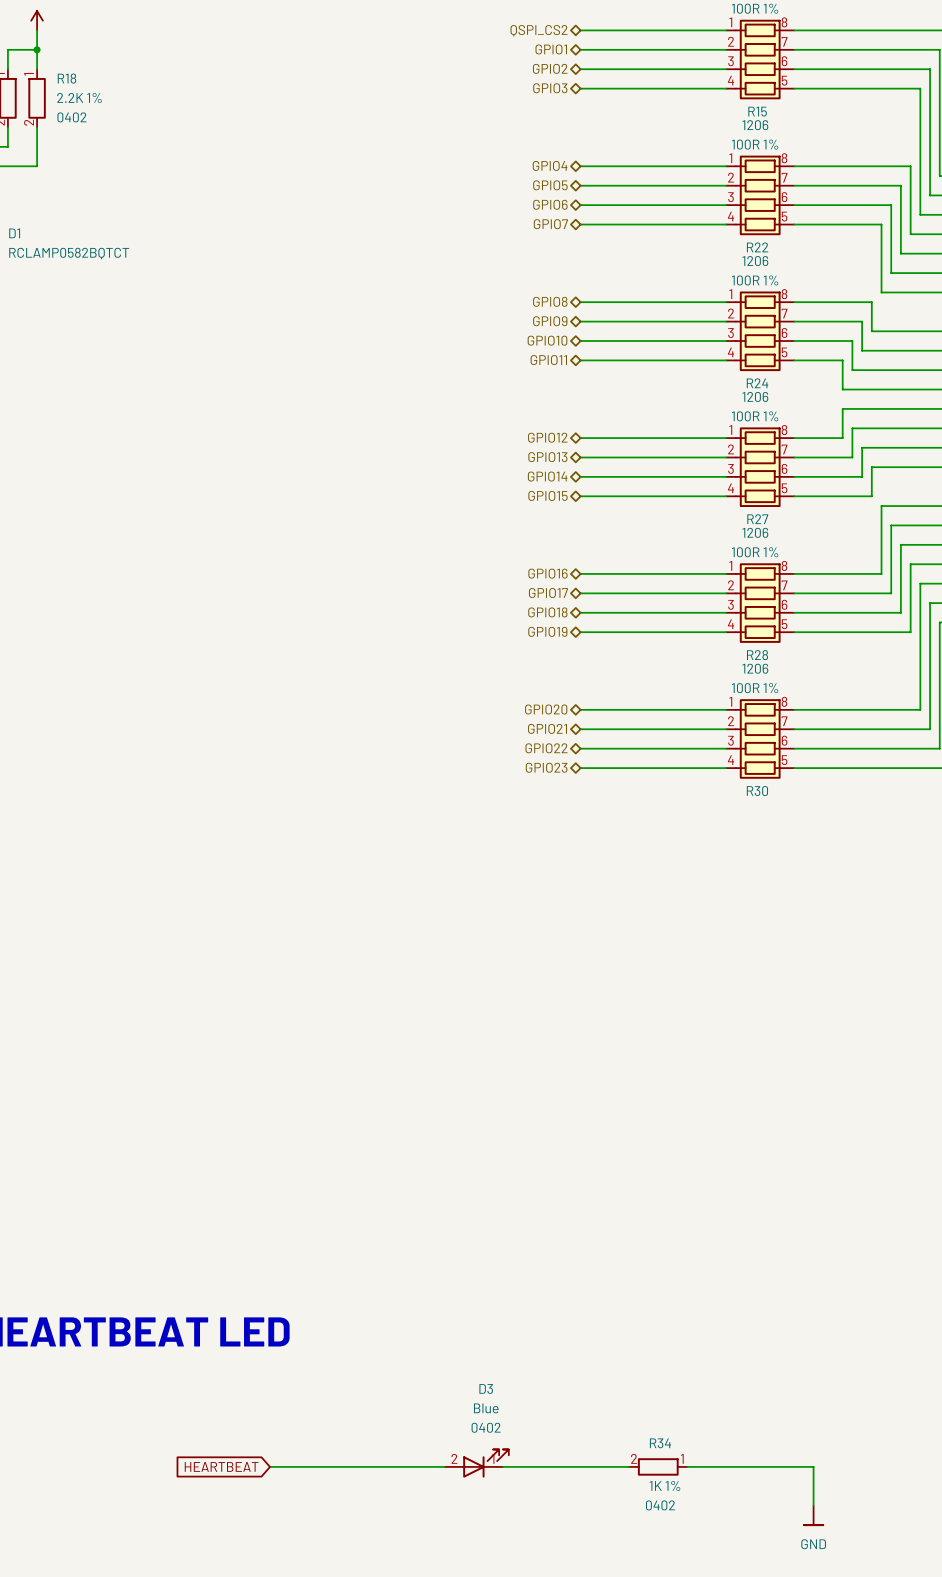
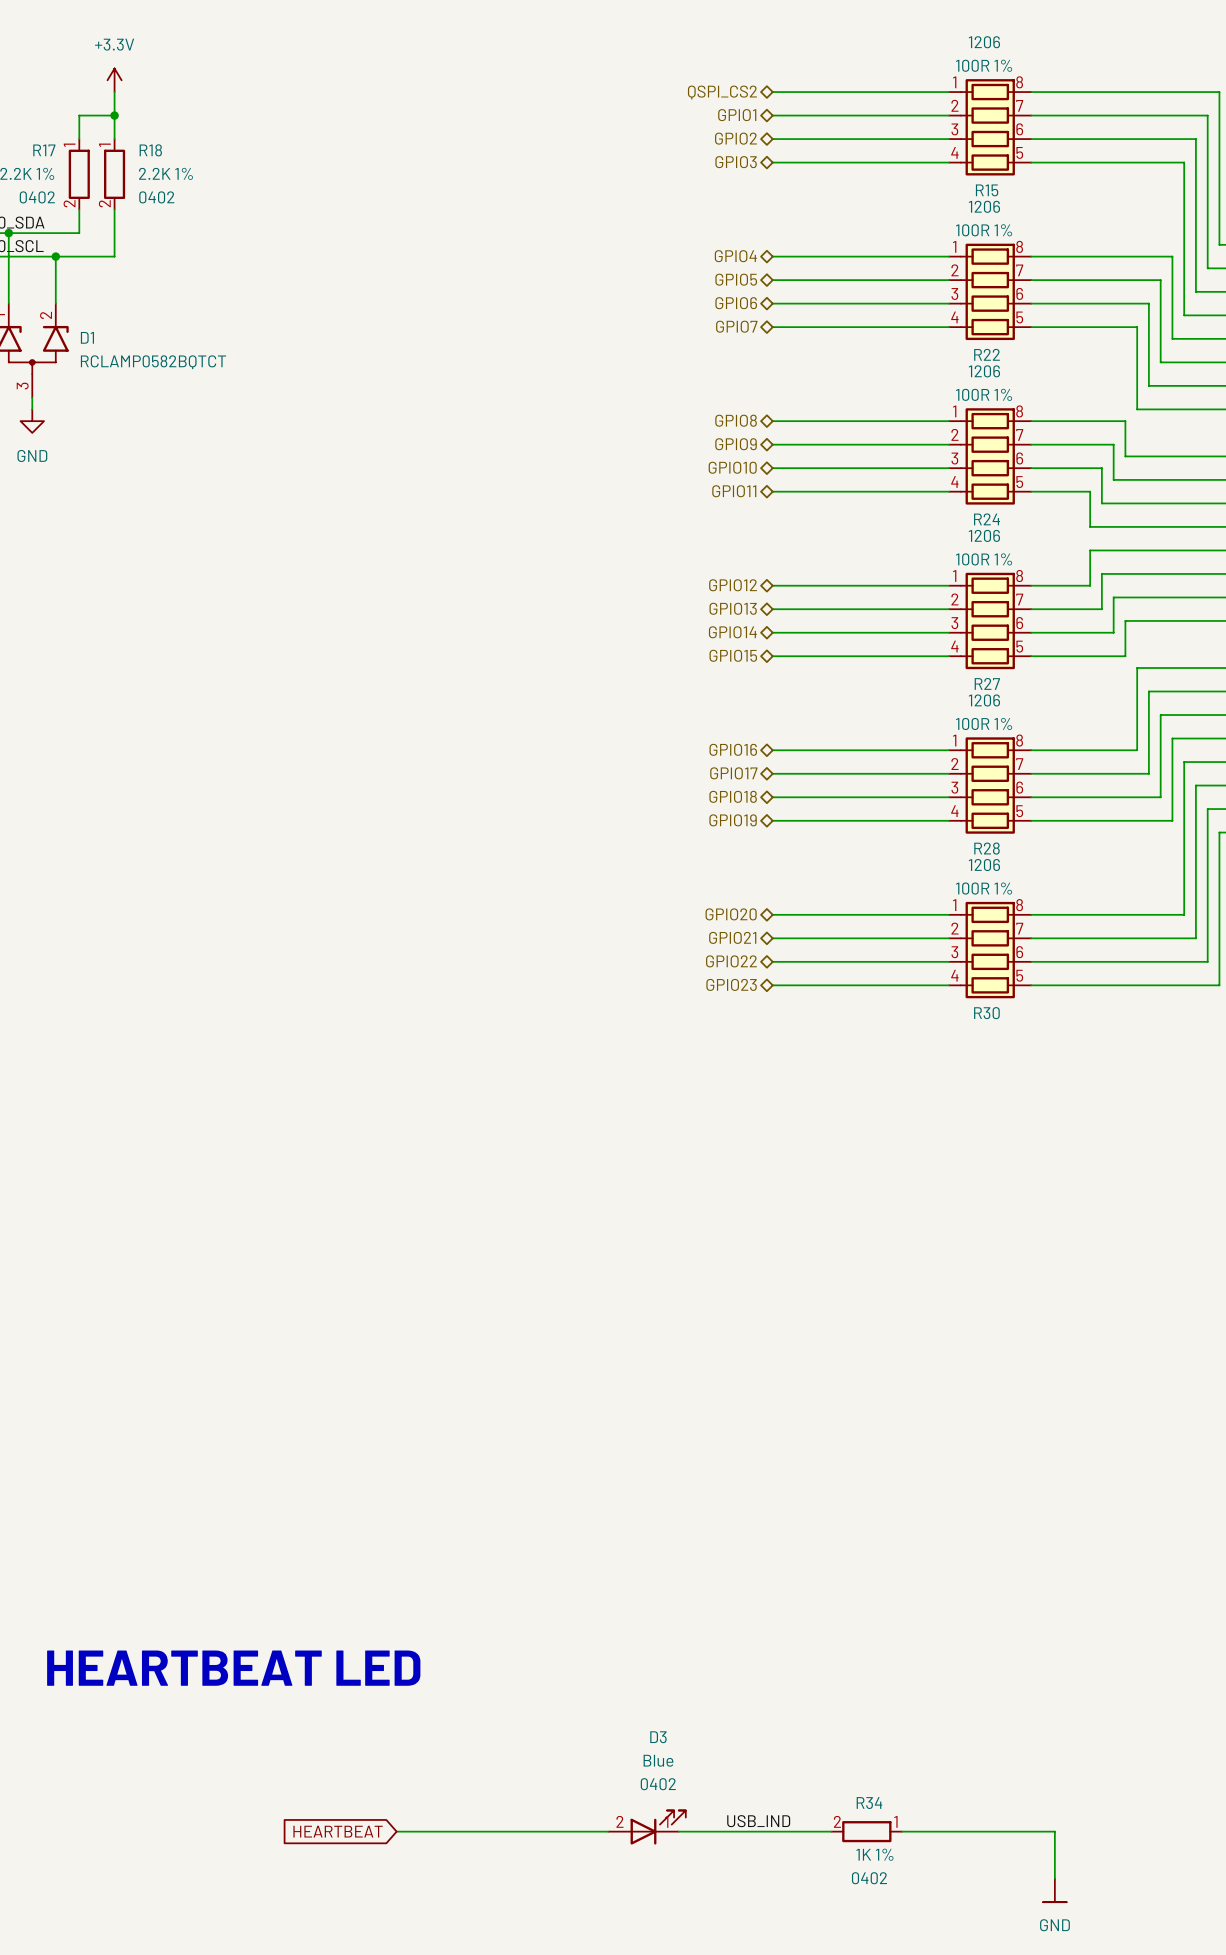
label: none -> USB_IND (758, 1821)

